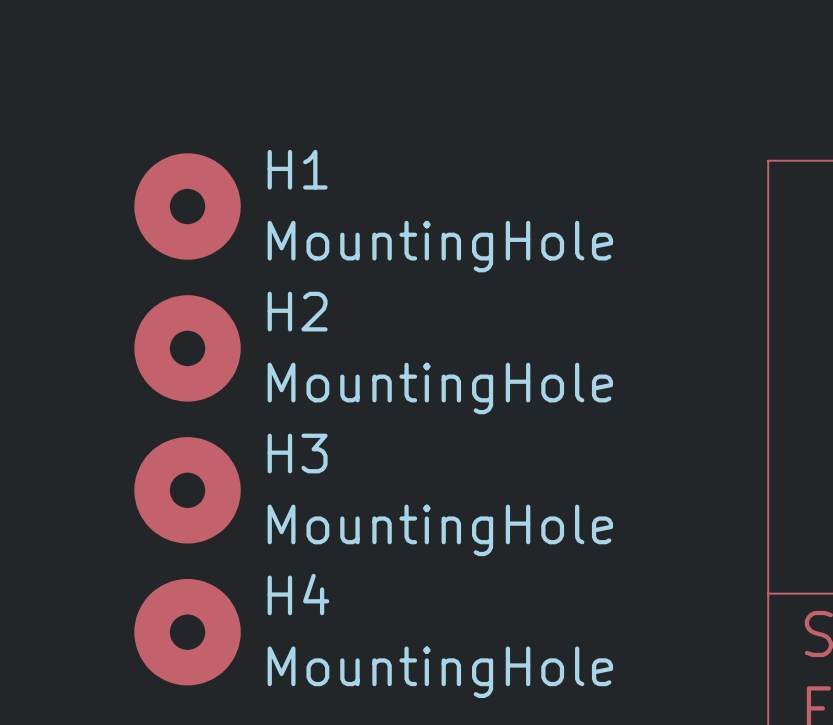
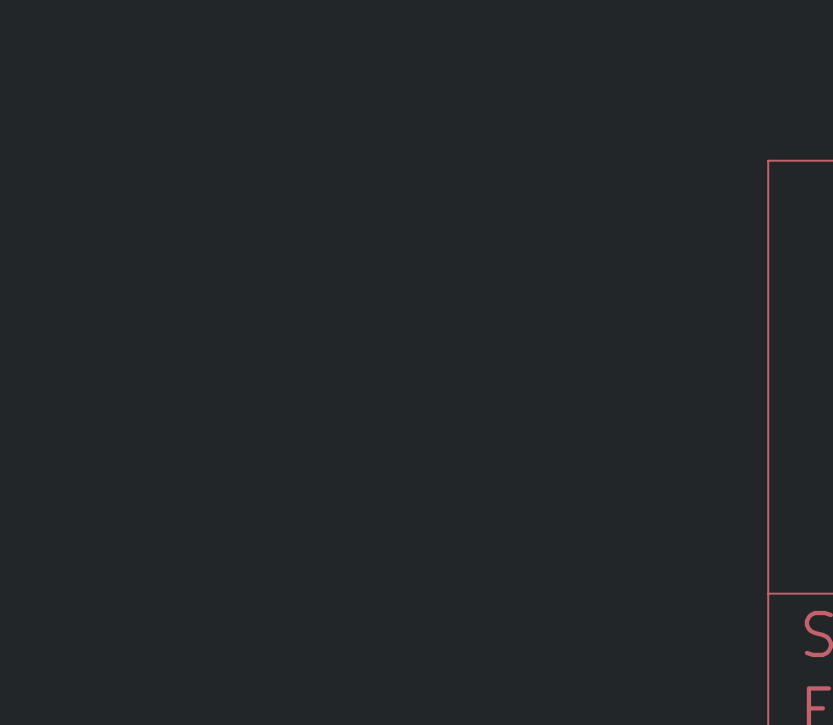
H1: MountingHole (187, 206) -> none
H2: MountingHole (187, 348) -> none
H3: MountingHole (187, 490) -> none
H4: MountingHole (187, 632) -> none

